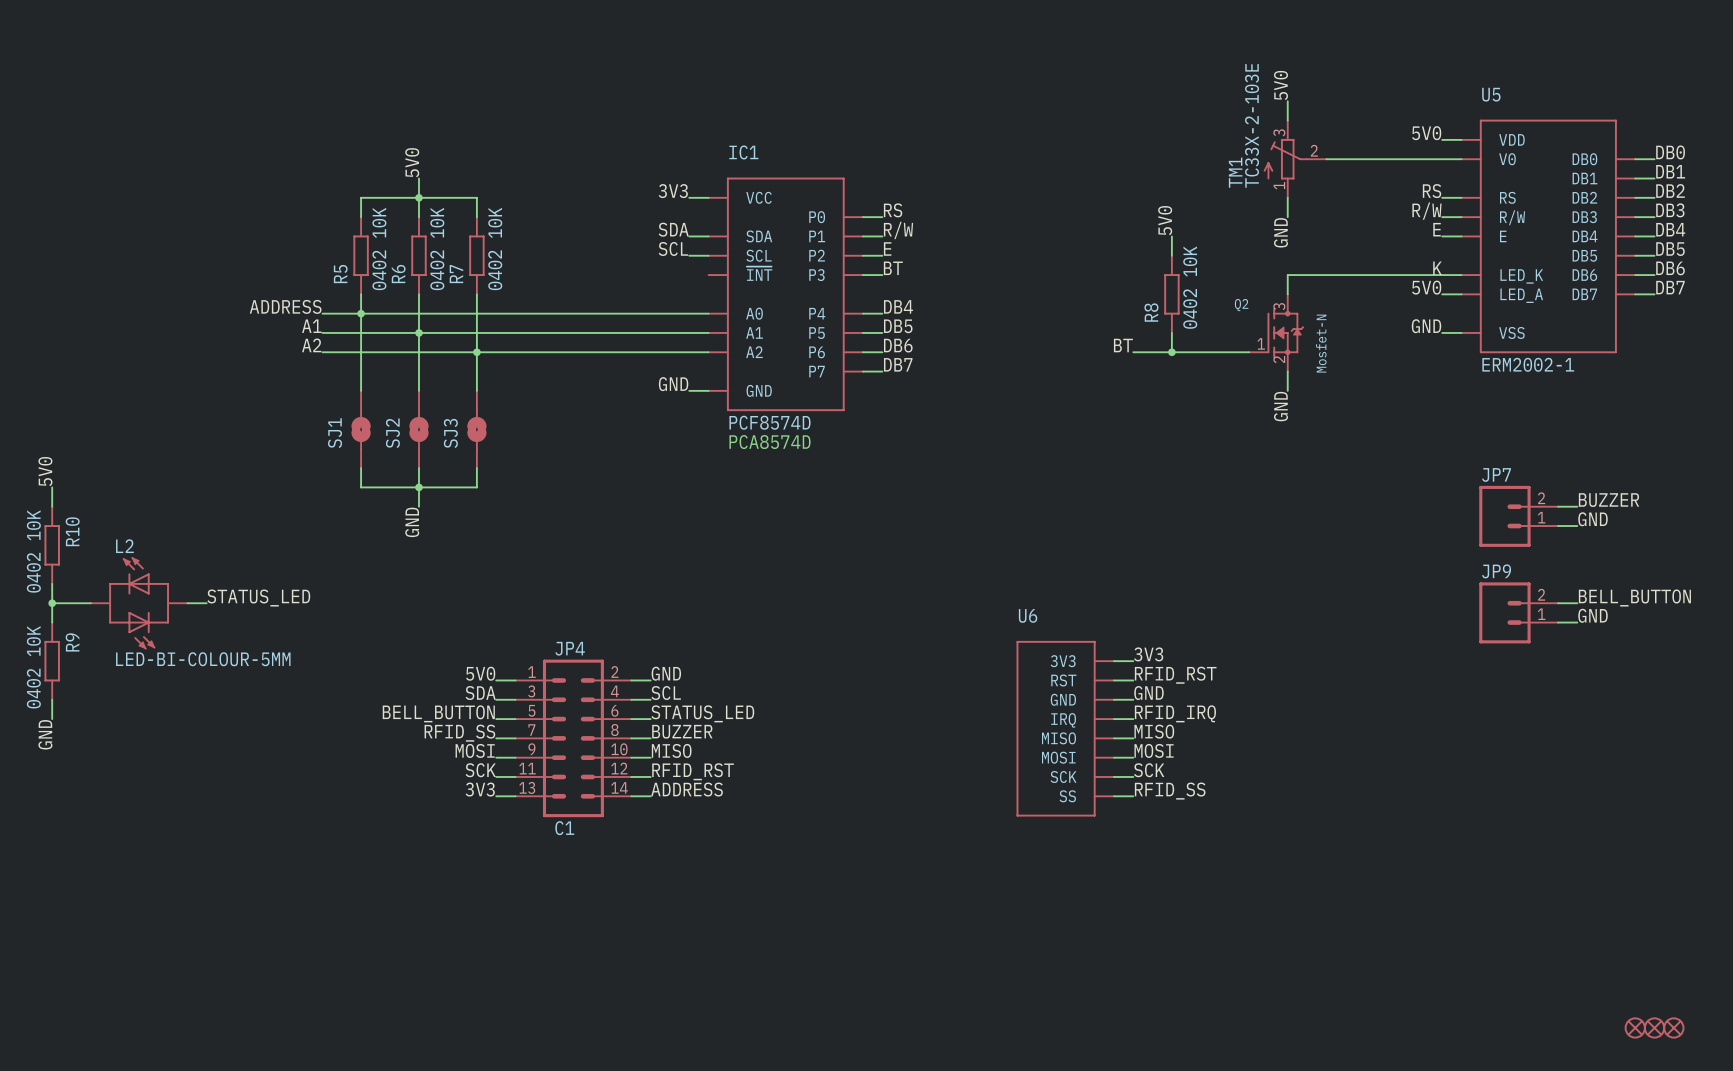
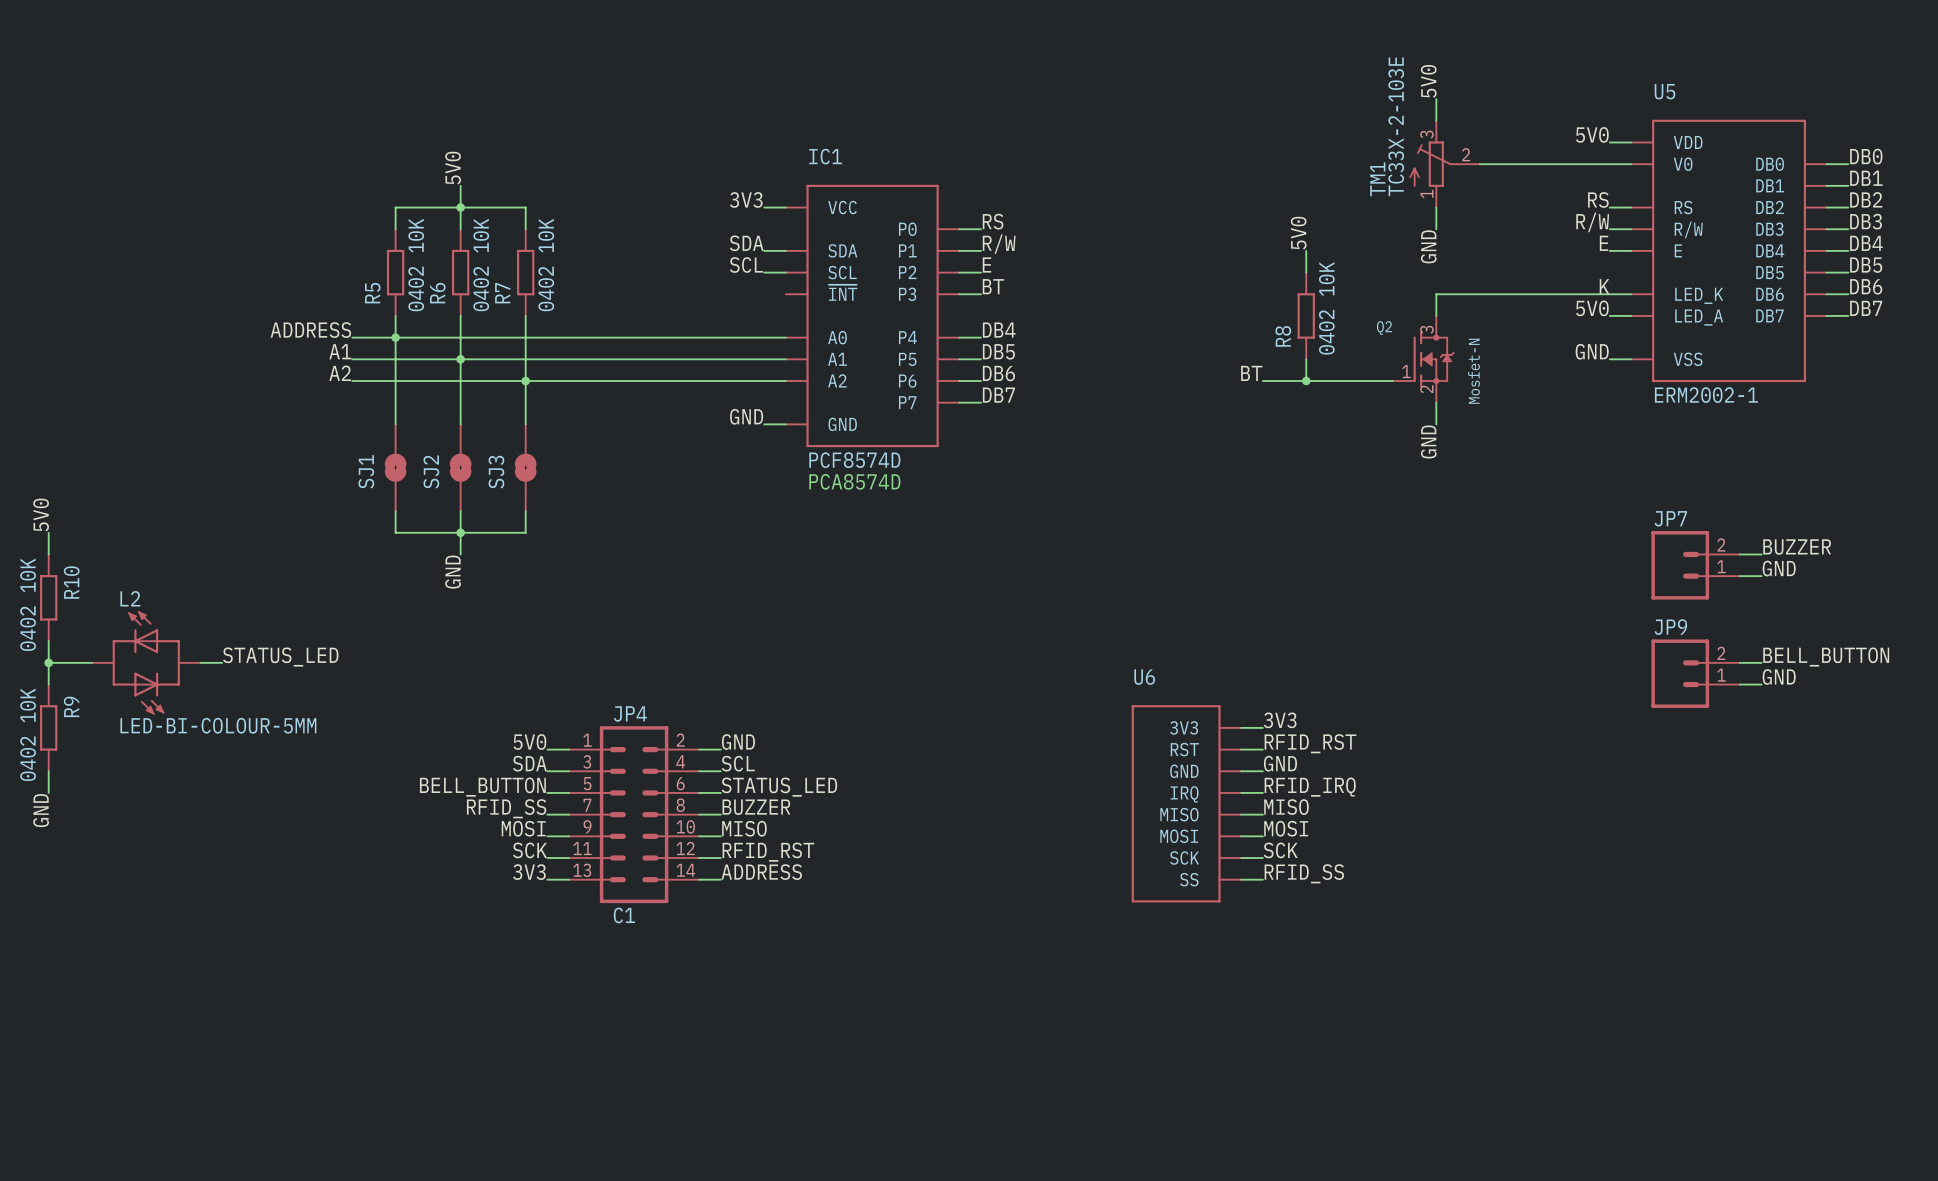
part: (1635, 1027) -> none
part: (1654, 1027) -> none
part: (1673, 1027) -> none

